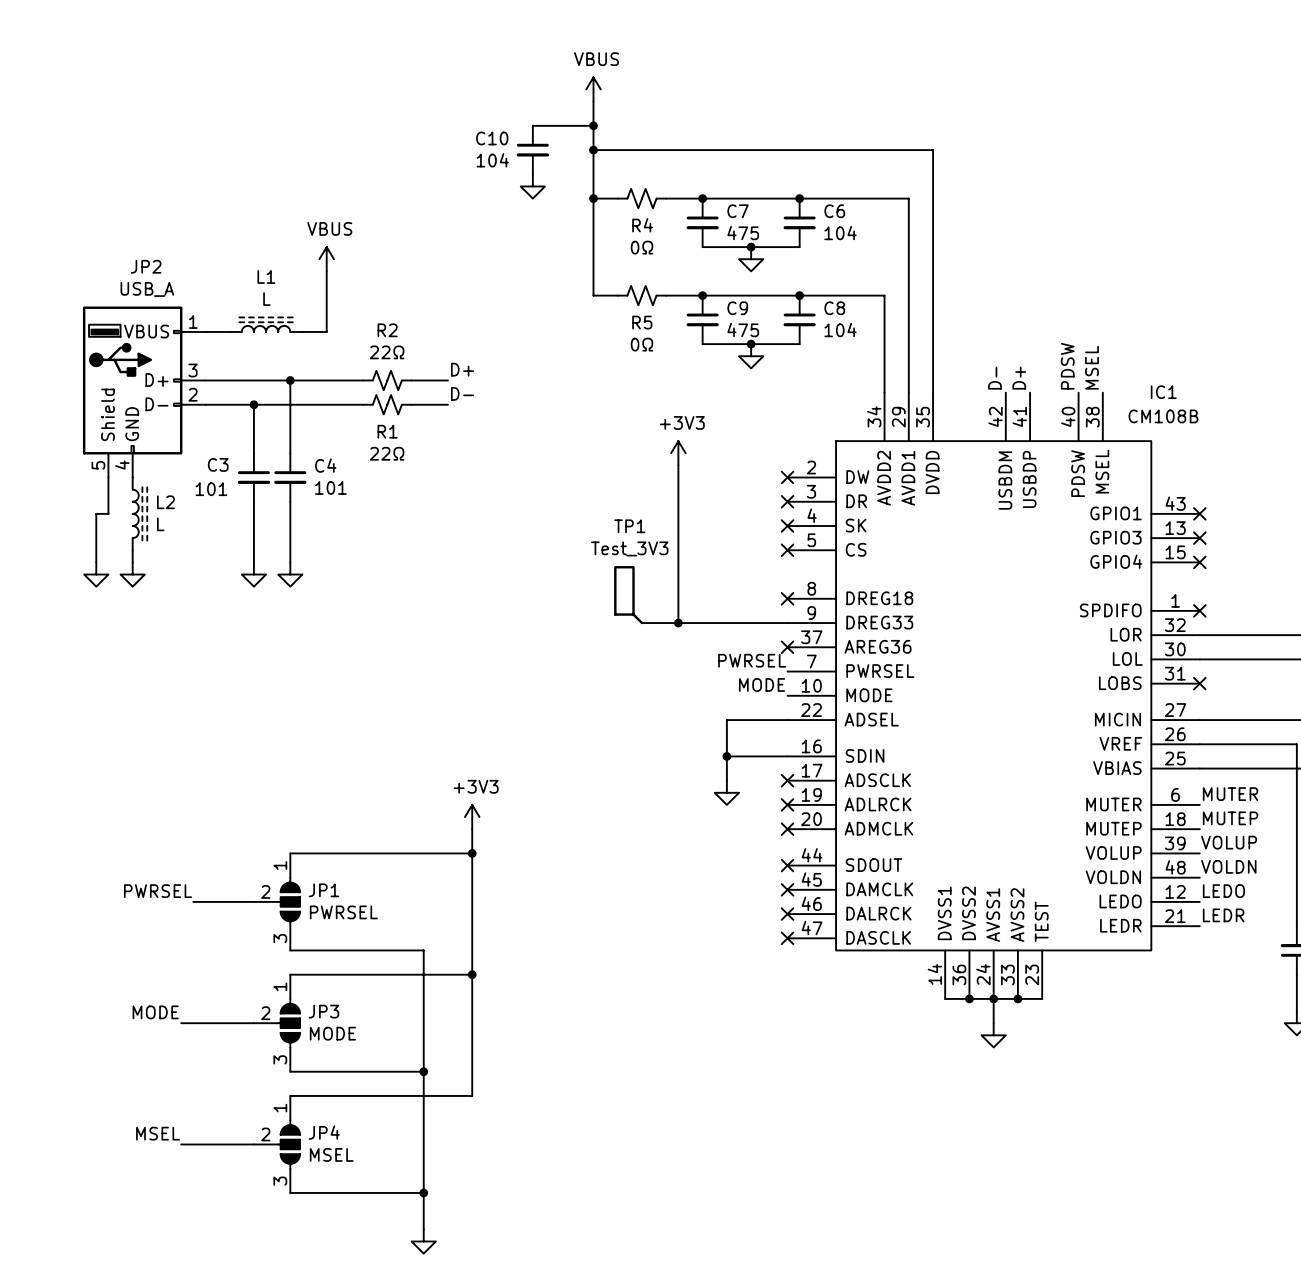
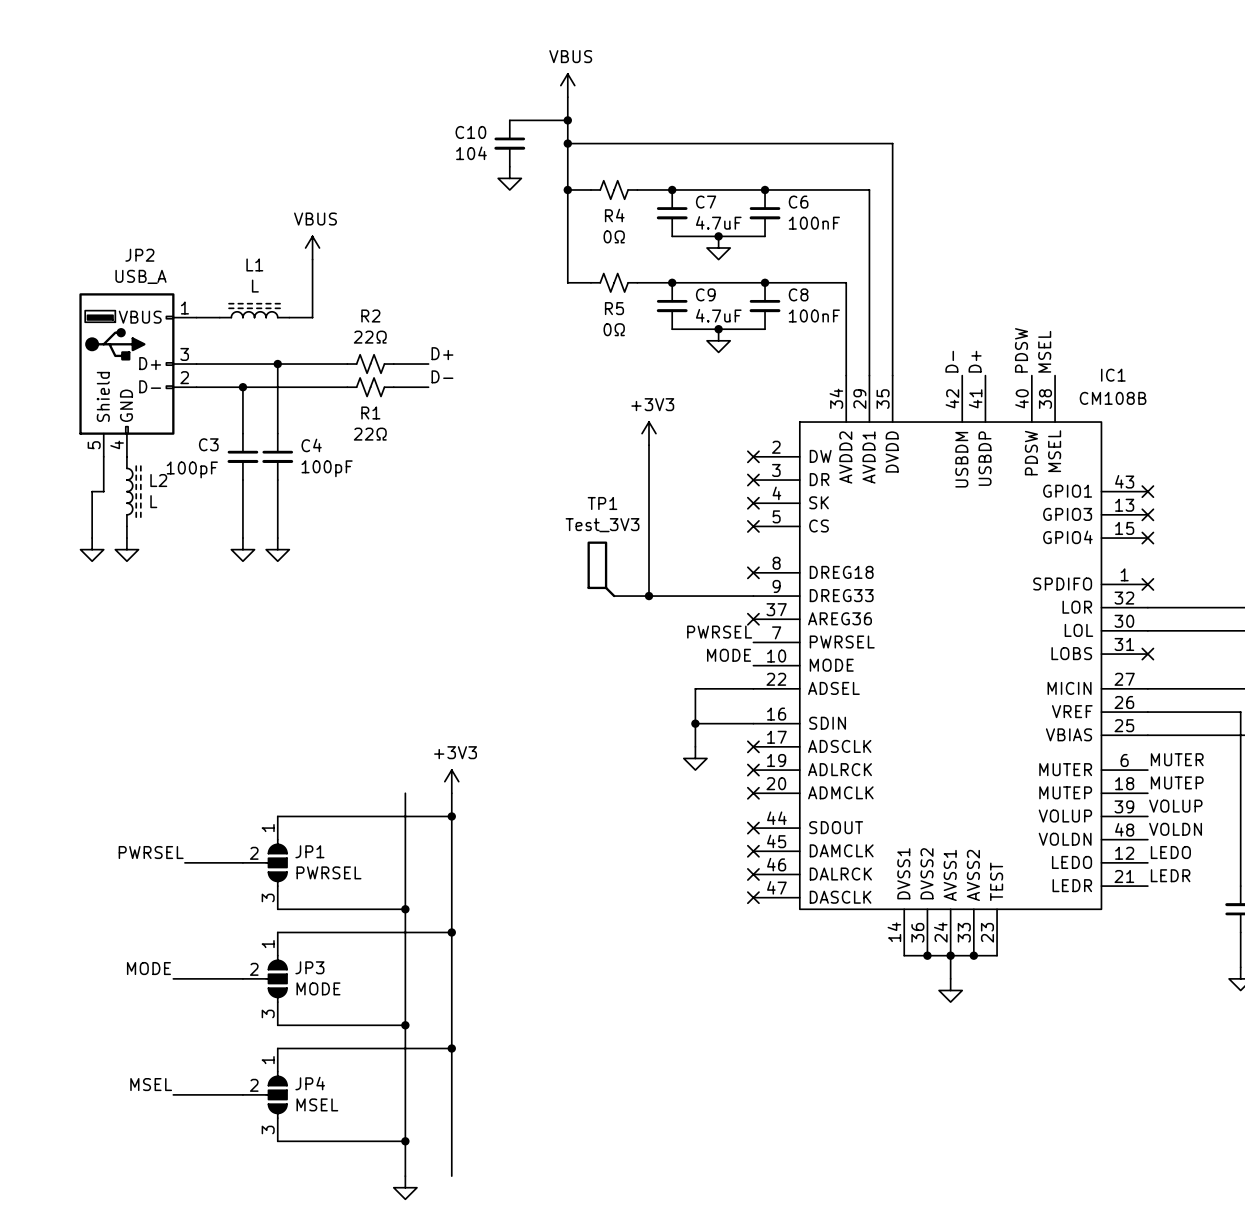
C7 value: 475 (743, 233) -> 4.7uF (718, 222)
C6 value: 104 (840, 233) -> 100nF (814, 223)
C9 value: 475 (743, 330) -> 4.7uF (718, 315)
C8 value: 104 (840, 330) -> 100nF (814, 316)
C4 value: 101 (330, 487) -> 100pF (327, 468)
C3 value: 101 (211, 489) -> 100pF (192, 469)
wire: none -> (405, 793) (405, 909)
junction: none -> (405, 909)
wire: none -> (451, 1048) (451, 1176)
junction: none -> (451, 1048)

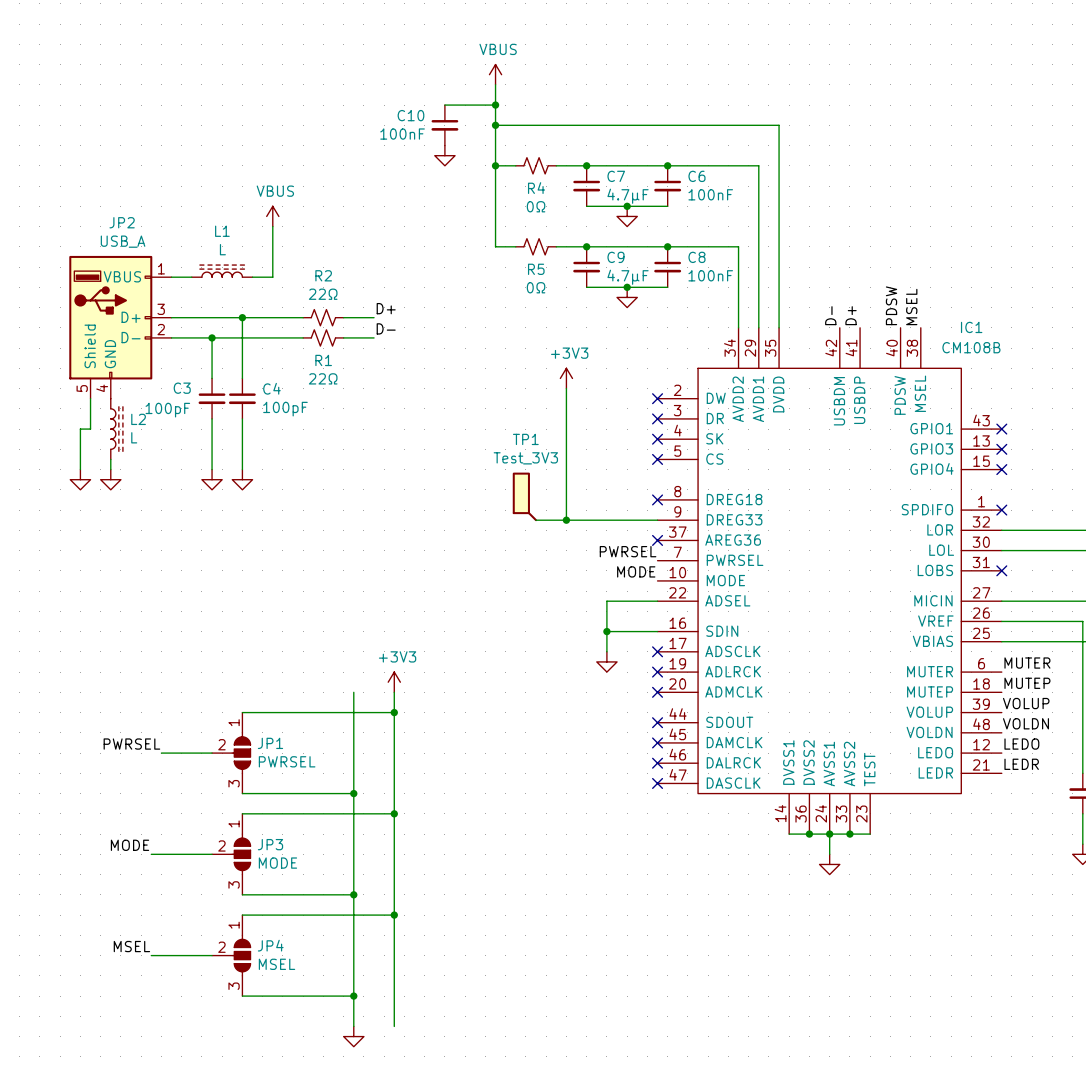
C10 value: 104 (471, 153) -> 100nF (402, 134)
C7 value: 4.7uF (718, 222) -> 4.7μF (628, 196)
C9 value: 4.7uF (718, 315) -> 4.7μF (628, 277)

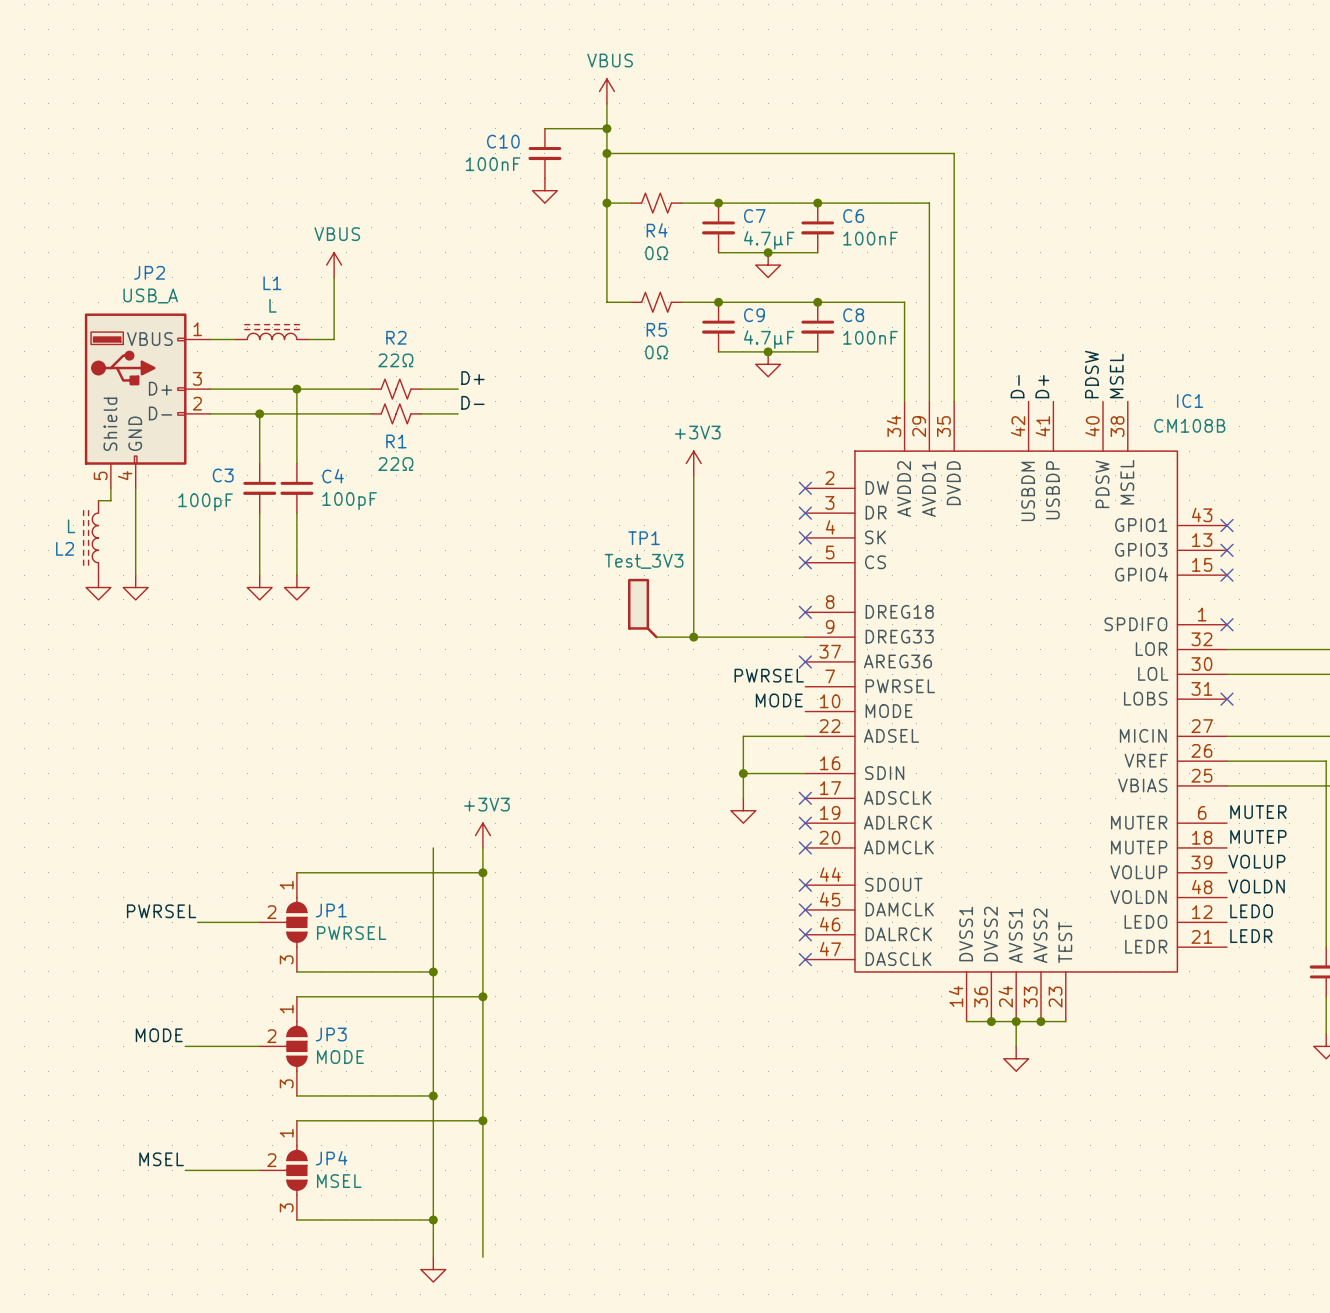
wire: none -> (135, 488) (135, 562)
wire: (90, 408) (90, 429) (80, 429) (80, 469) -> (110, 500) (98, 500)
L2 rotation: 0° (116, 429) -> 180° (91, 537)
L2 position: (116, 429) -> (91, 537)

